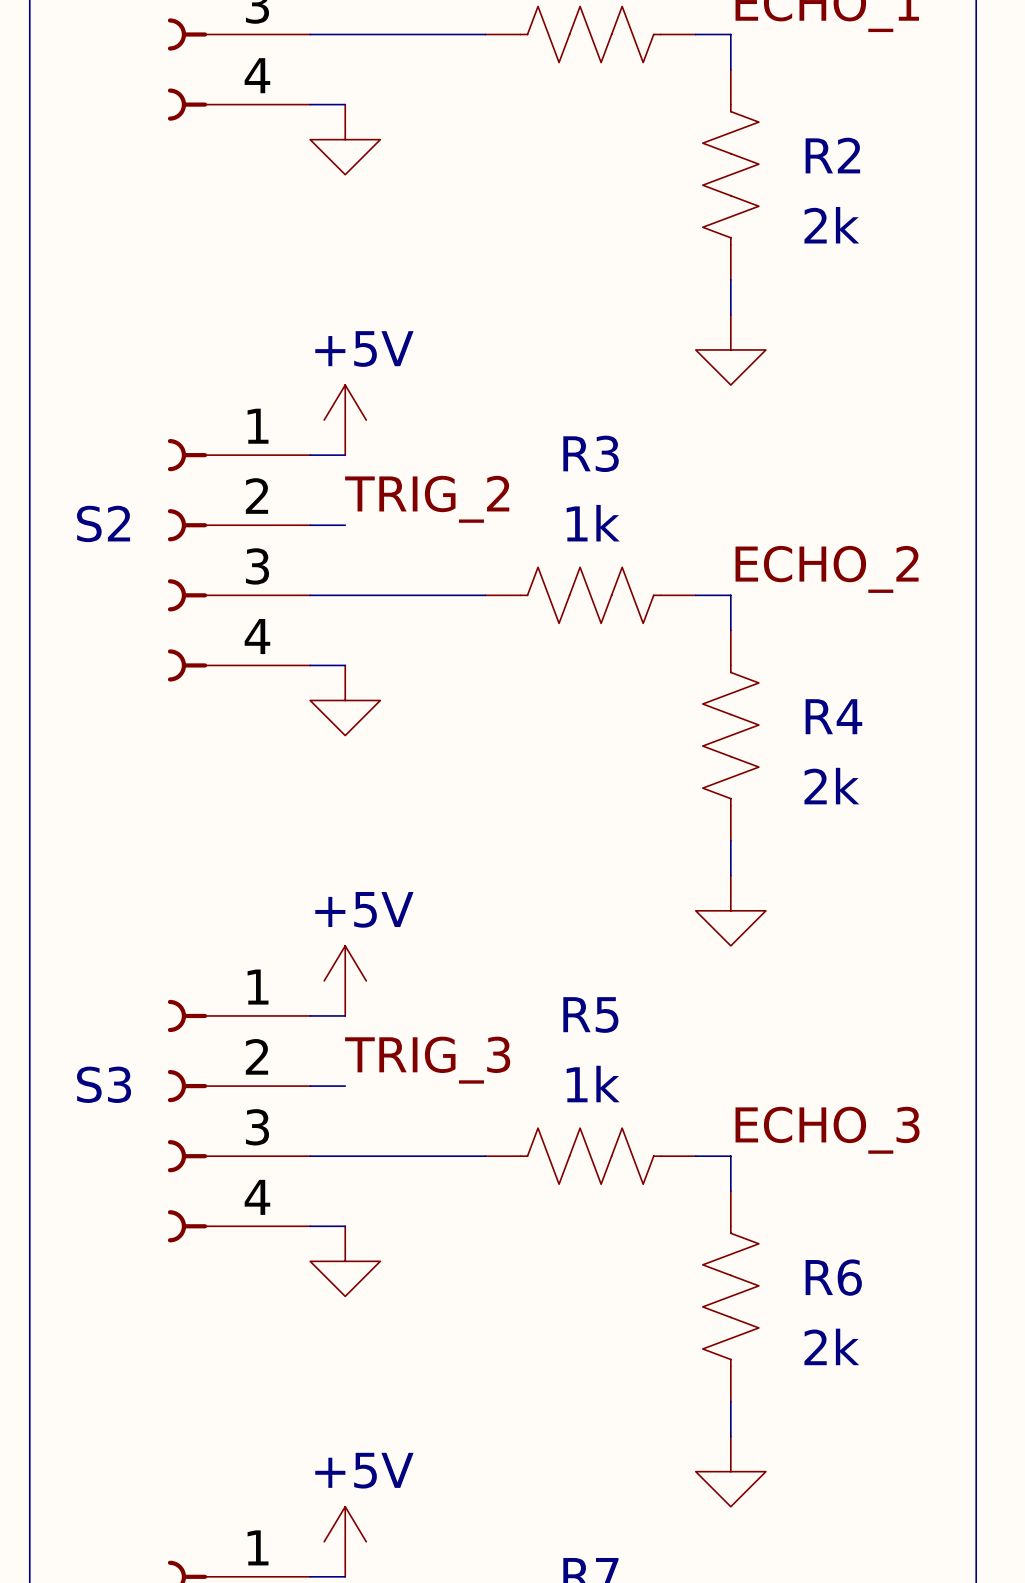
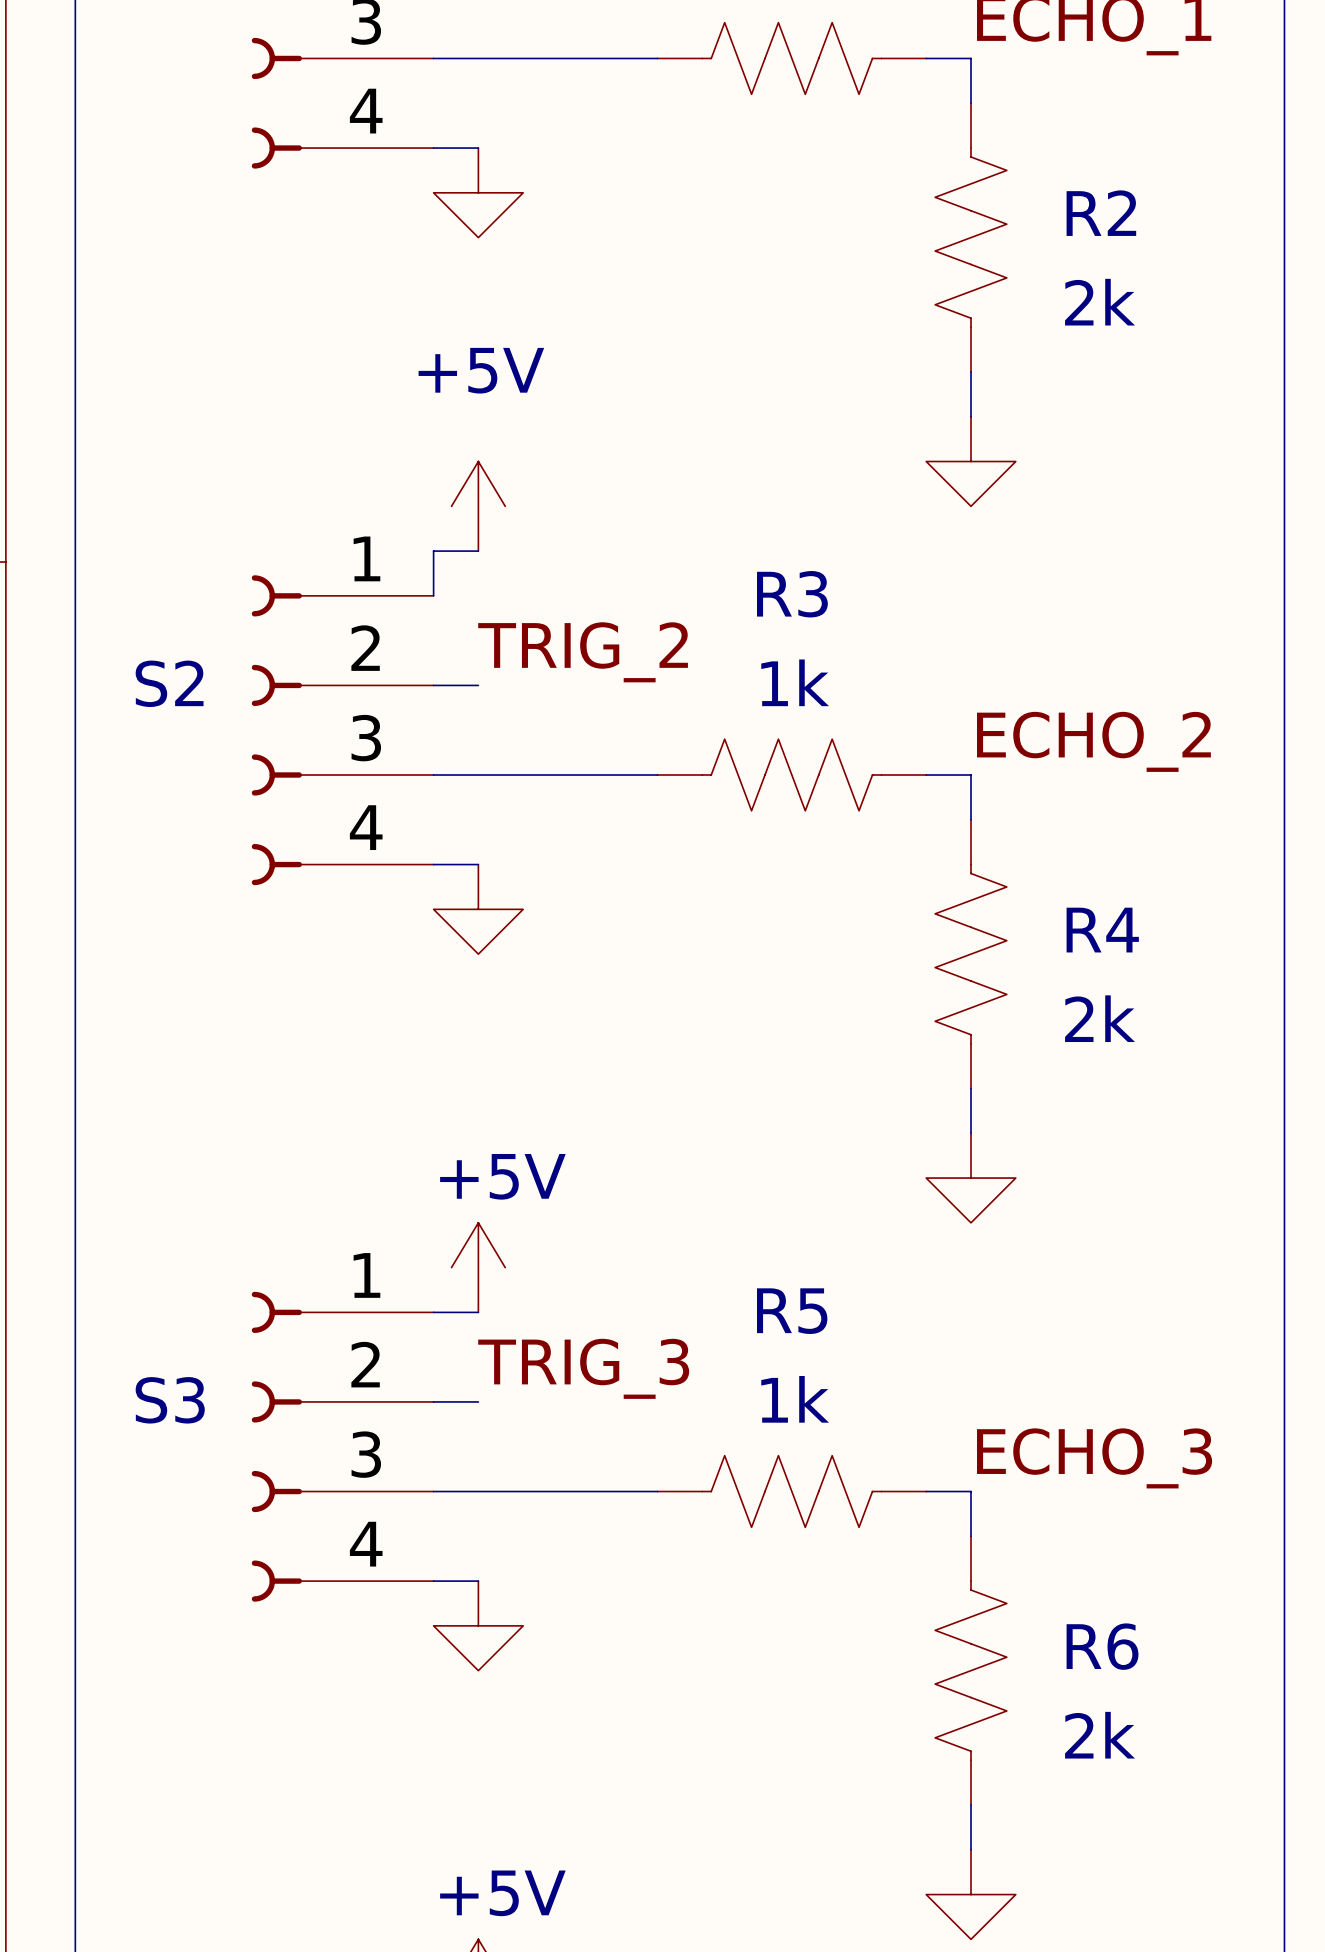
power symbol text position: +5V (364, 349) -> +5V (481, 370)
power symbol position: +5V (345, 420) -> +5V (478, 506)
wire: (310, 455) (345, 455) -> (433, 595) (433, 551) (478, 551)

